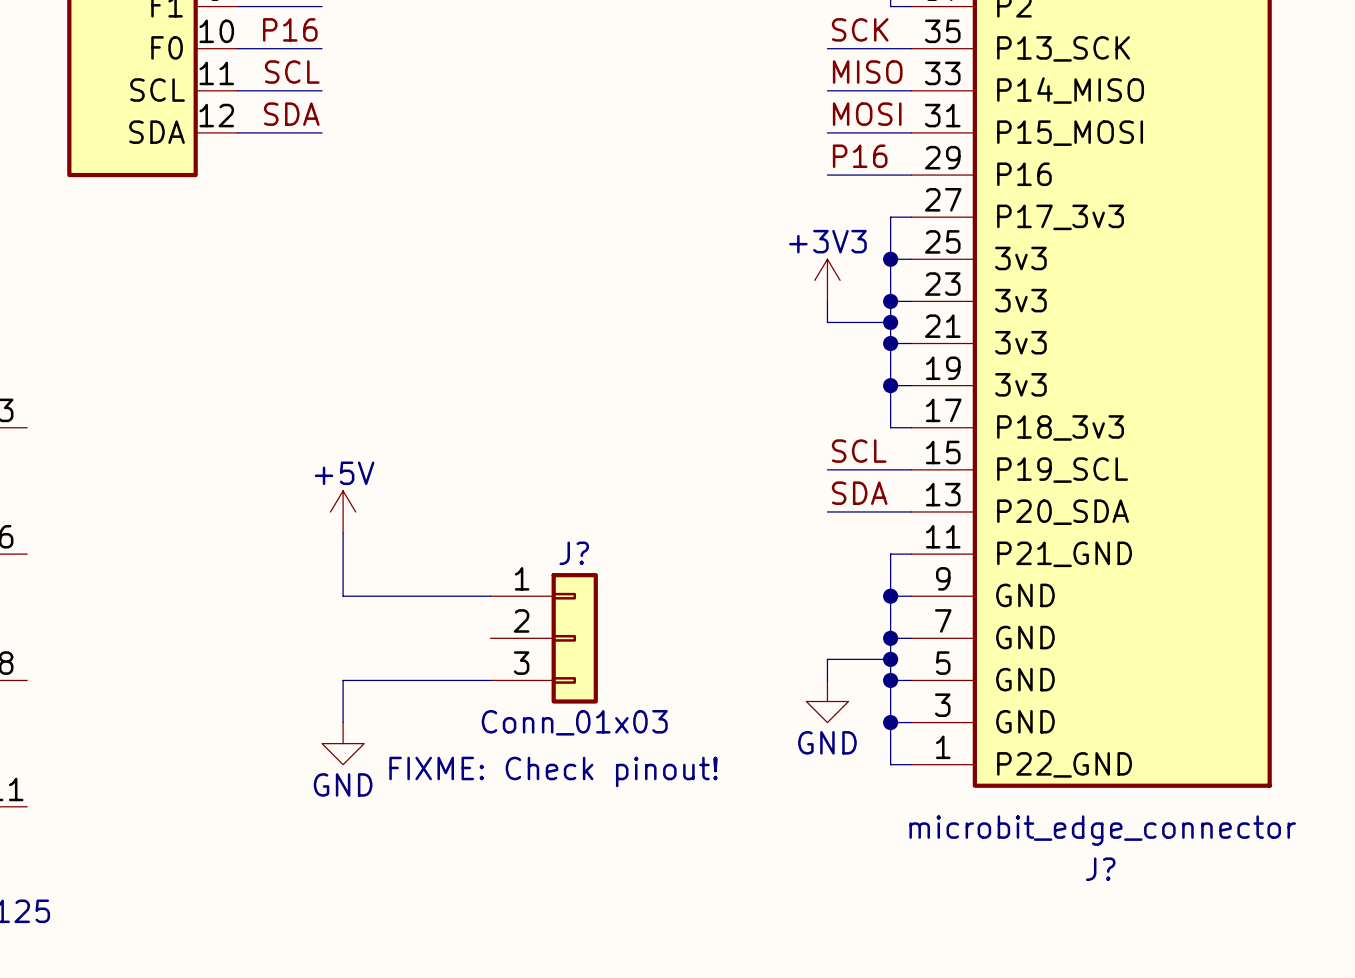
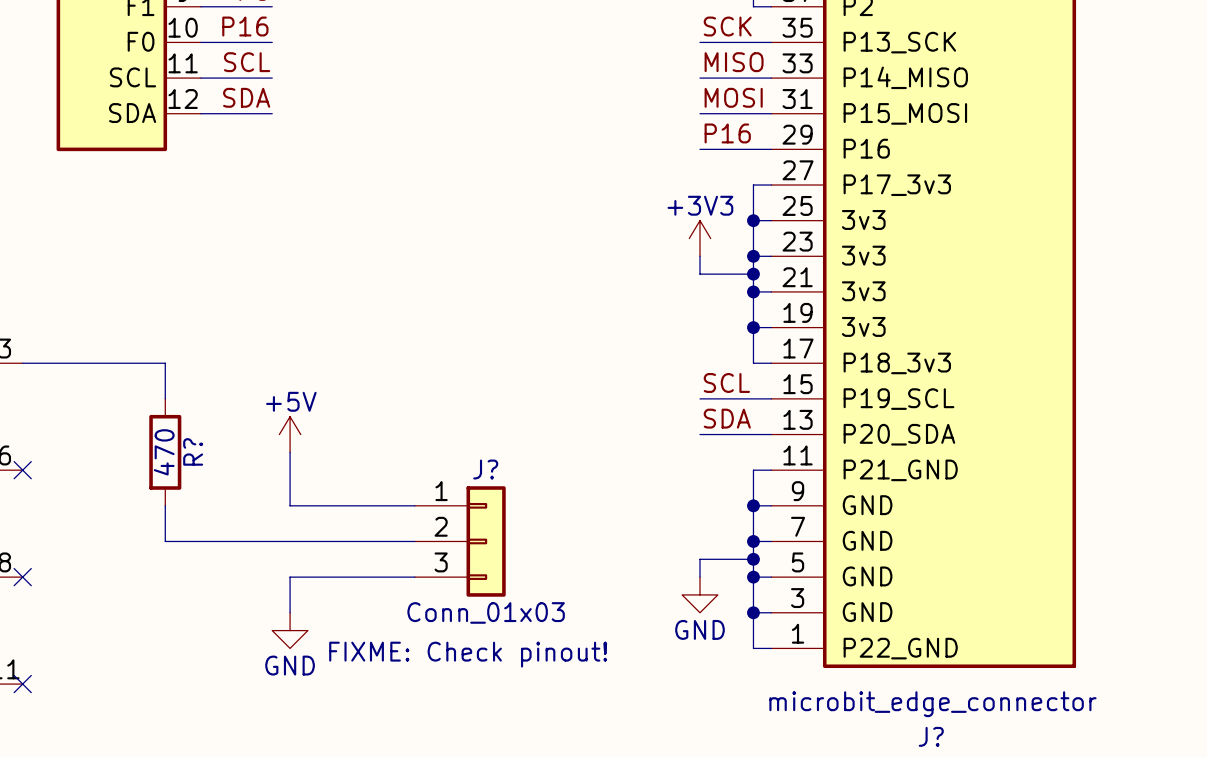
wire: none -> (22, 363) (165, 363) (165, 398)
R?: none -> 470 (165, 452)
no-connect mark: none -> (22, 470)
wire: none -> (165, 505) (165, 541) (414, 541)
no-connect mark: none -> (22, 577)
no-connect mark: none -> (22, 684)

